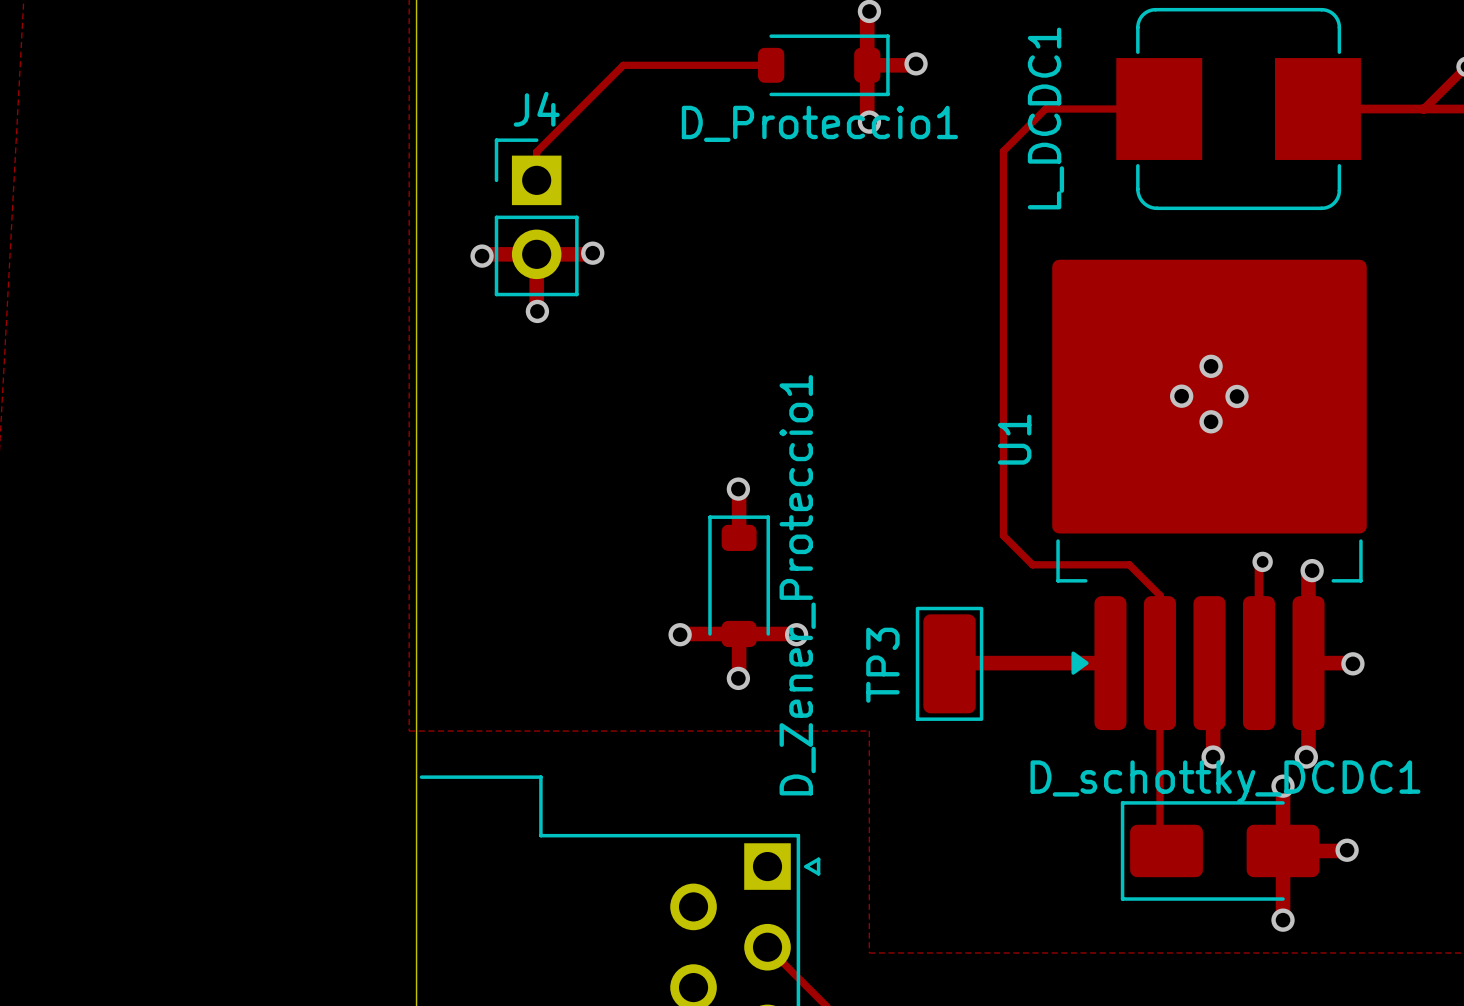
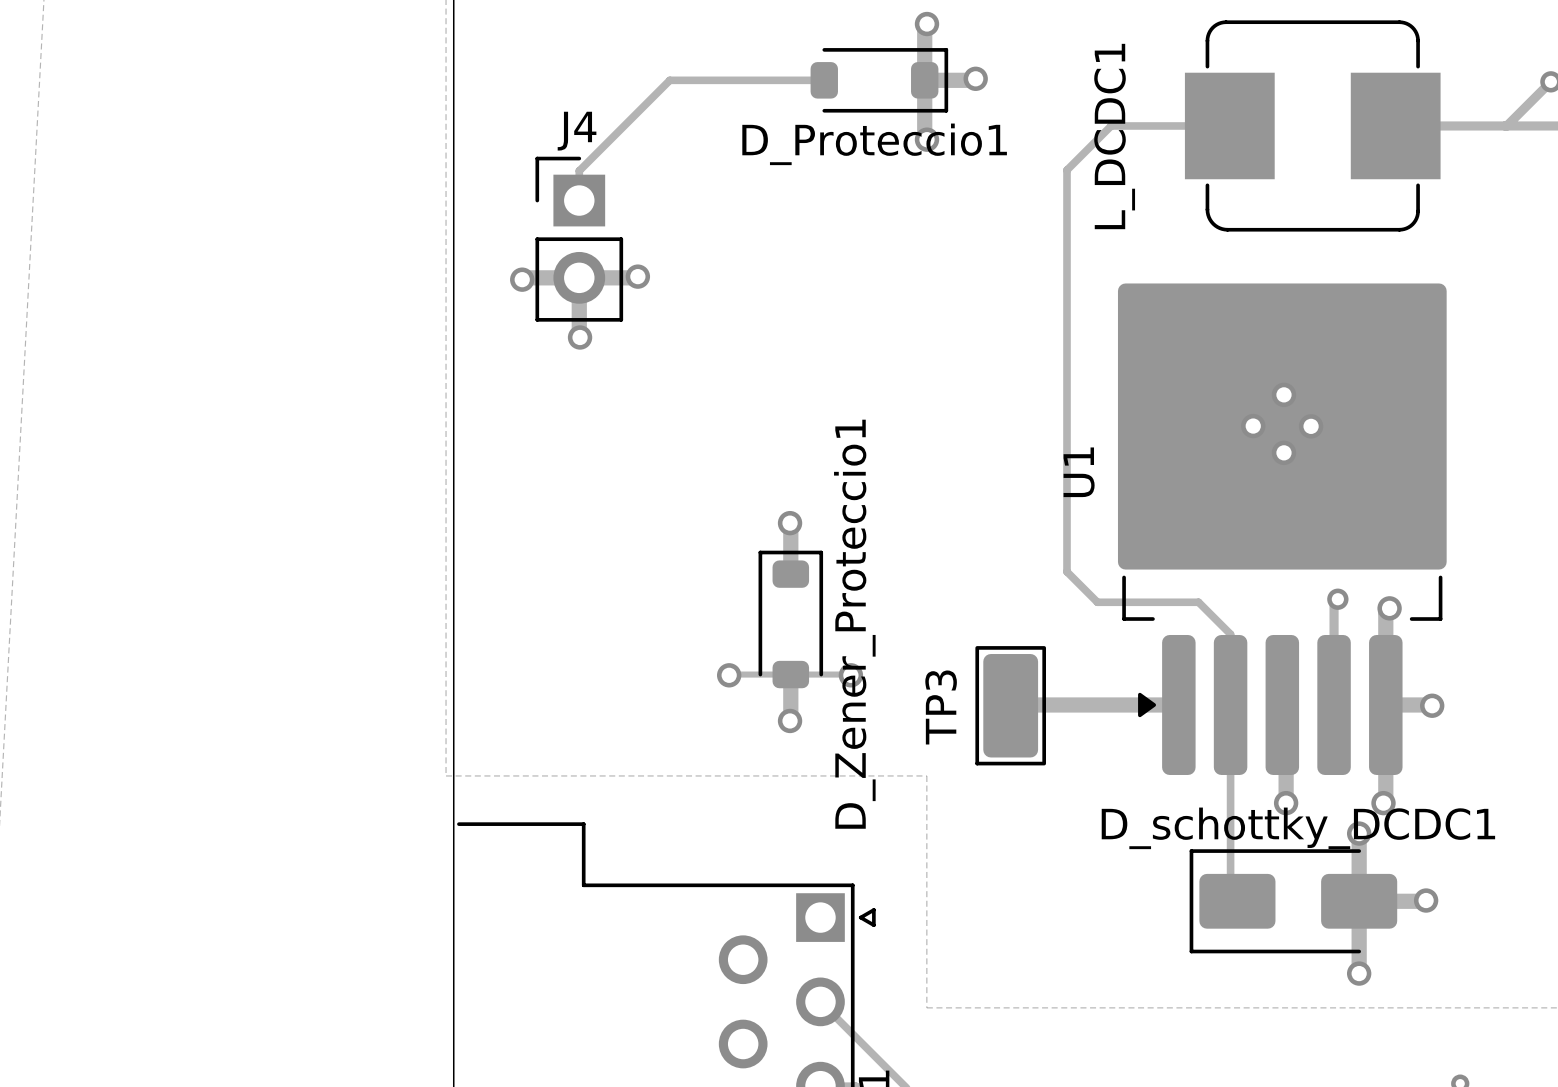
track width: thick (680, 634) (796, 634) -> thin (729, 675) (850, 675)

